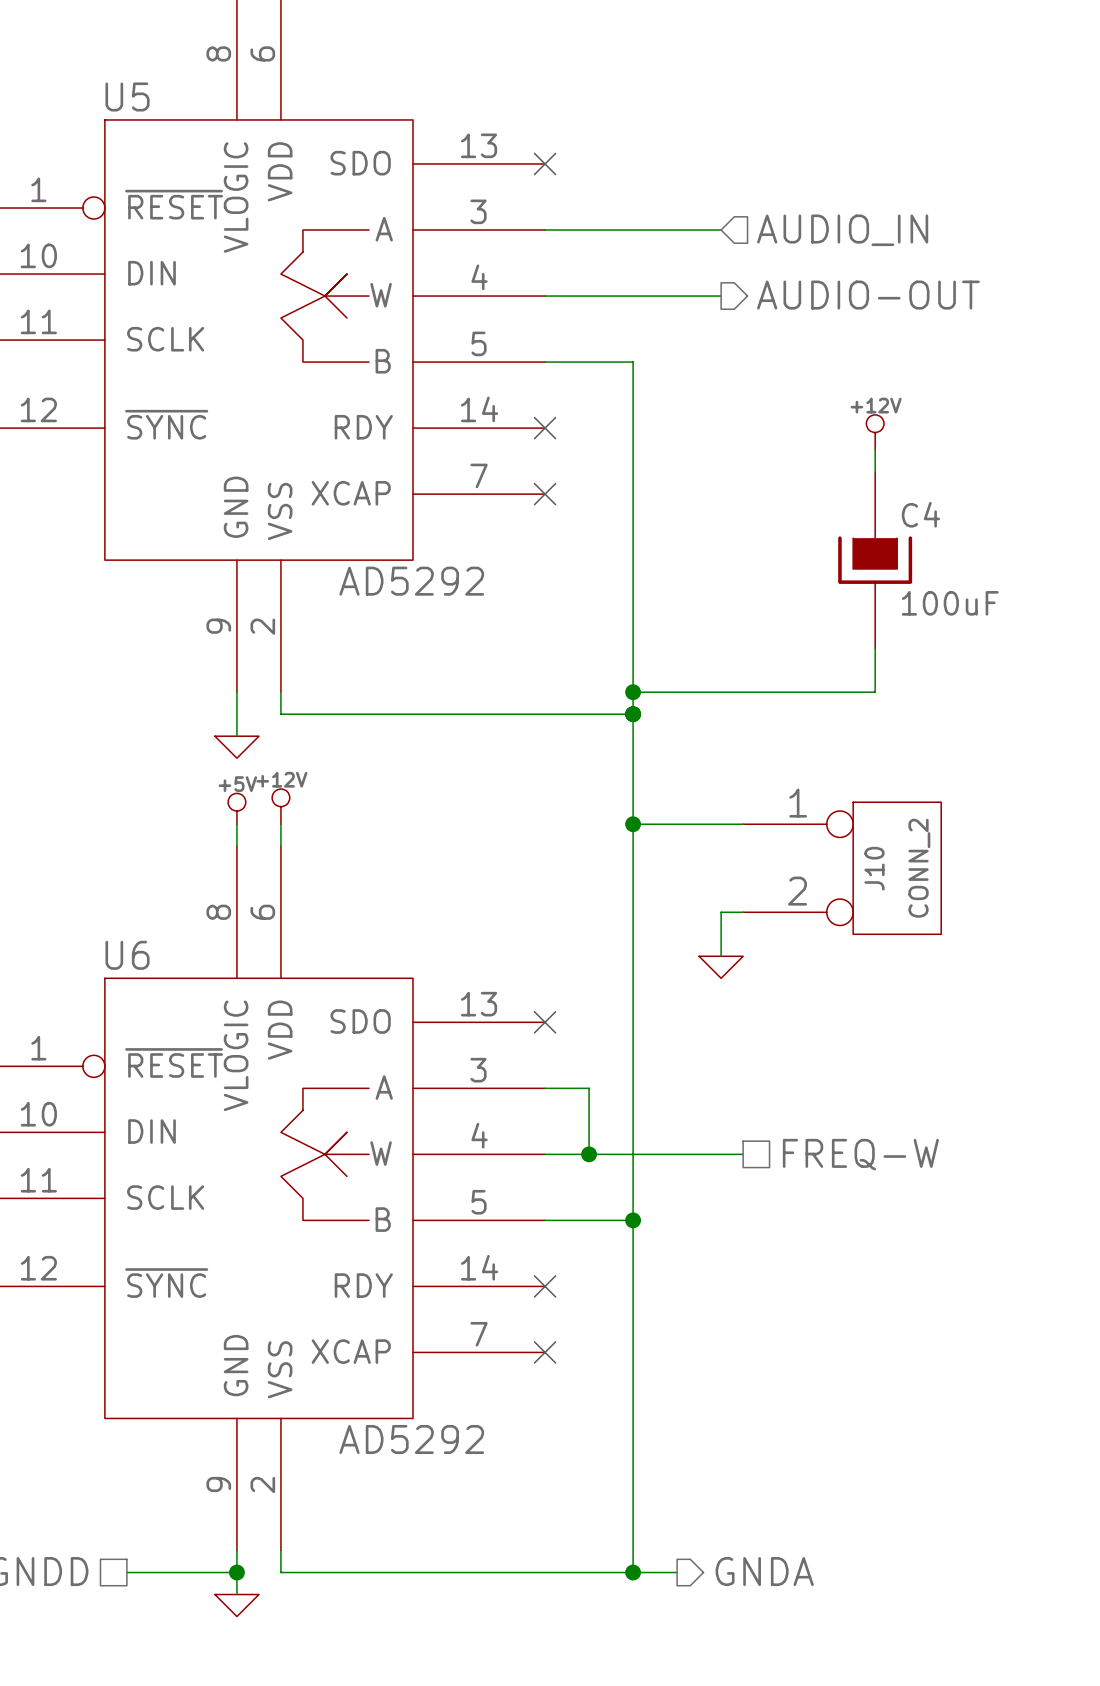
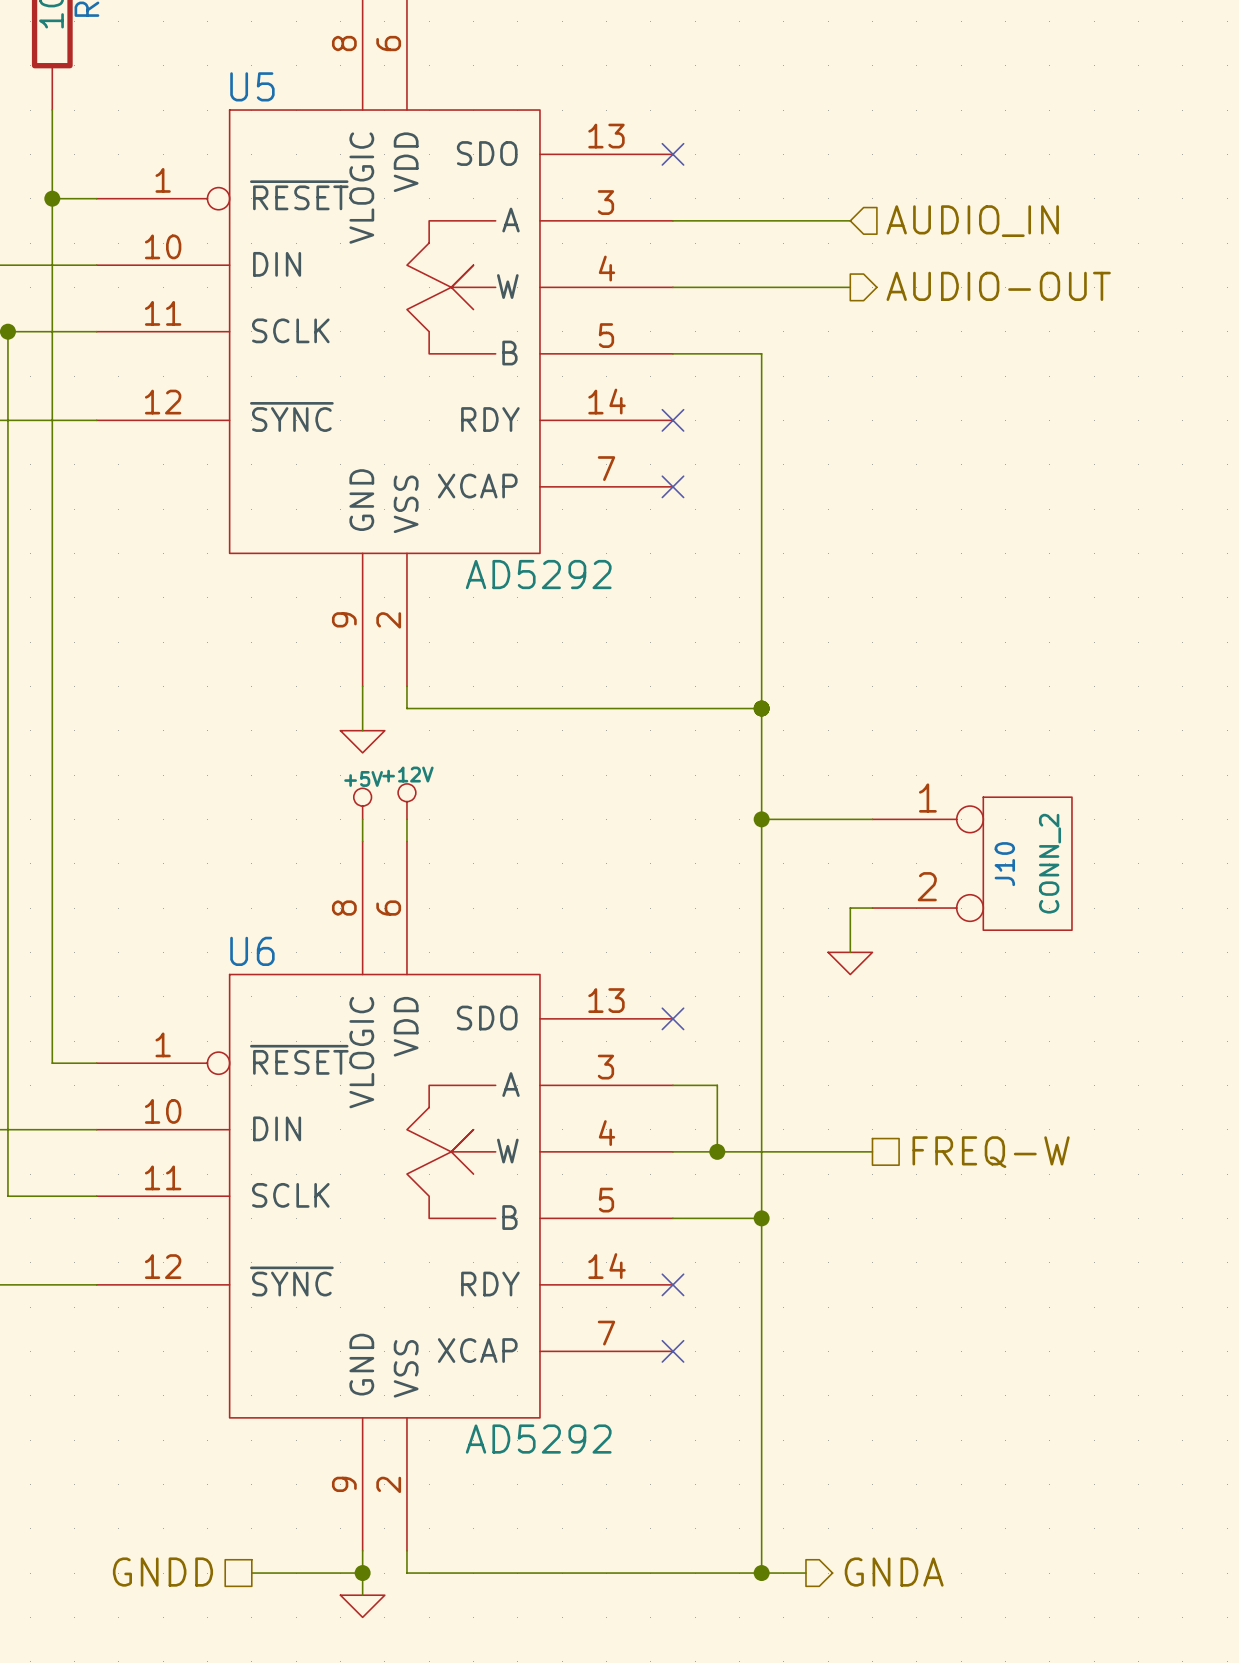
power symbol: +12V (875, 432) -> none
wire: (875, 450) (875, 472) -> none
C4: 100uF (875, 560) -> none
wire: (875, 648) (875, 692) (633, 692) -> none
junction: (633, 692) -> none

